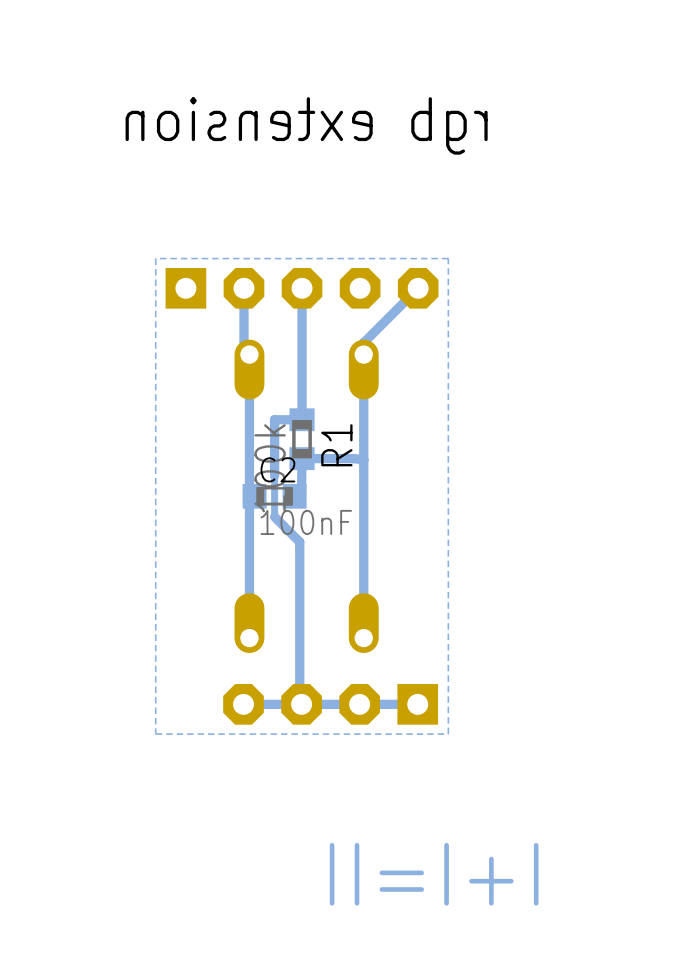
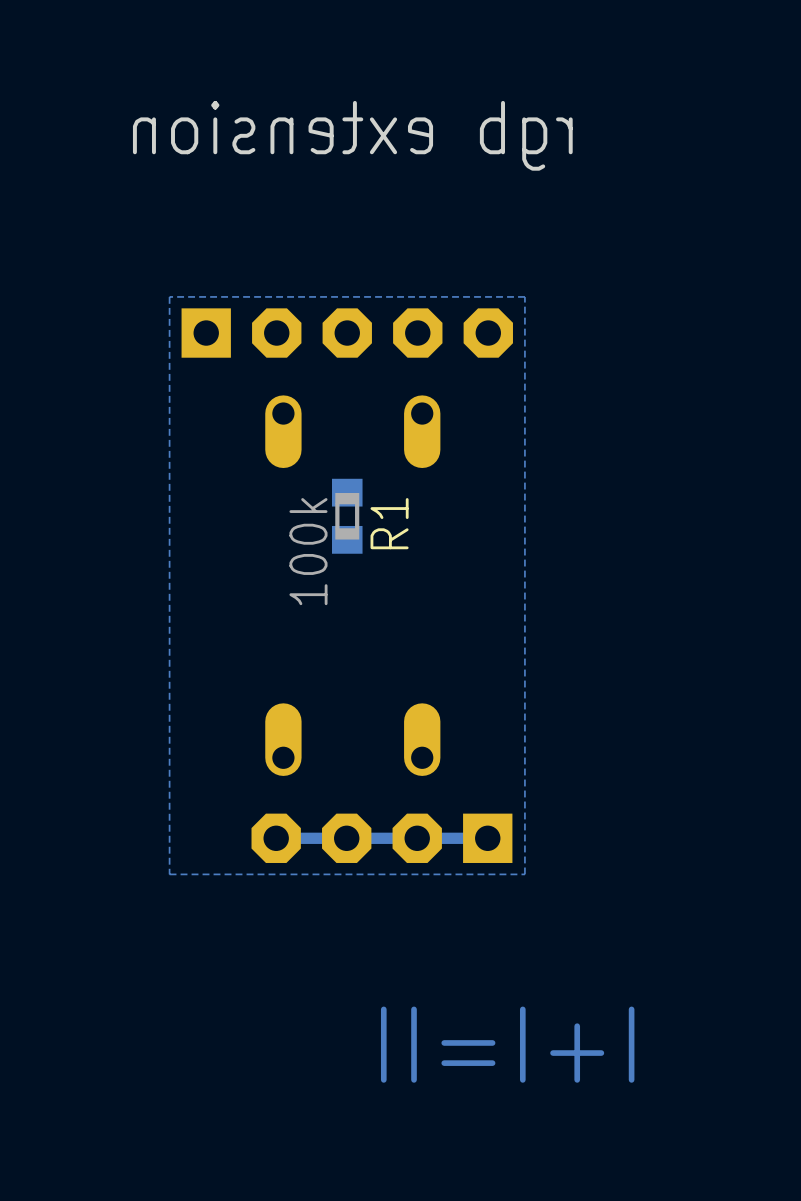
track: (243, 288) (243, 349) (249, 354) (249, 638) -> none
track: (302, 288) (302, 419) (274, 419) (274, 516) (299, 542) (299, 702) (301, 704) -> none
track: (418, 288) (363, 342) (363, 638) -> none
track: (363, 459) (302, 458) (301, 493) (294, 496) -> none
C2: 100nF (274, 496) -> none

